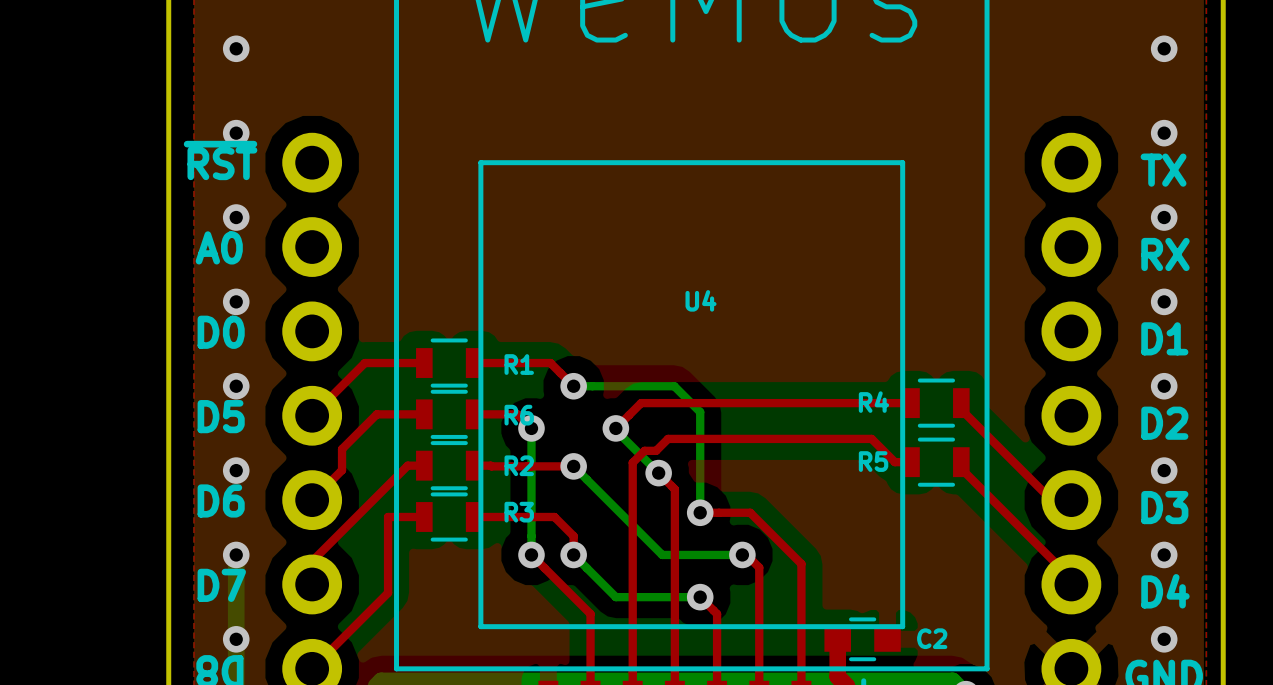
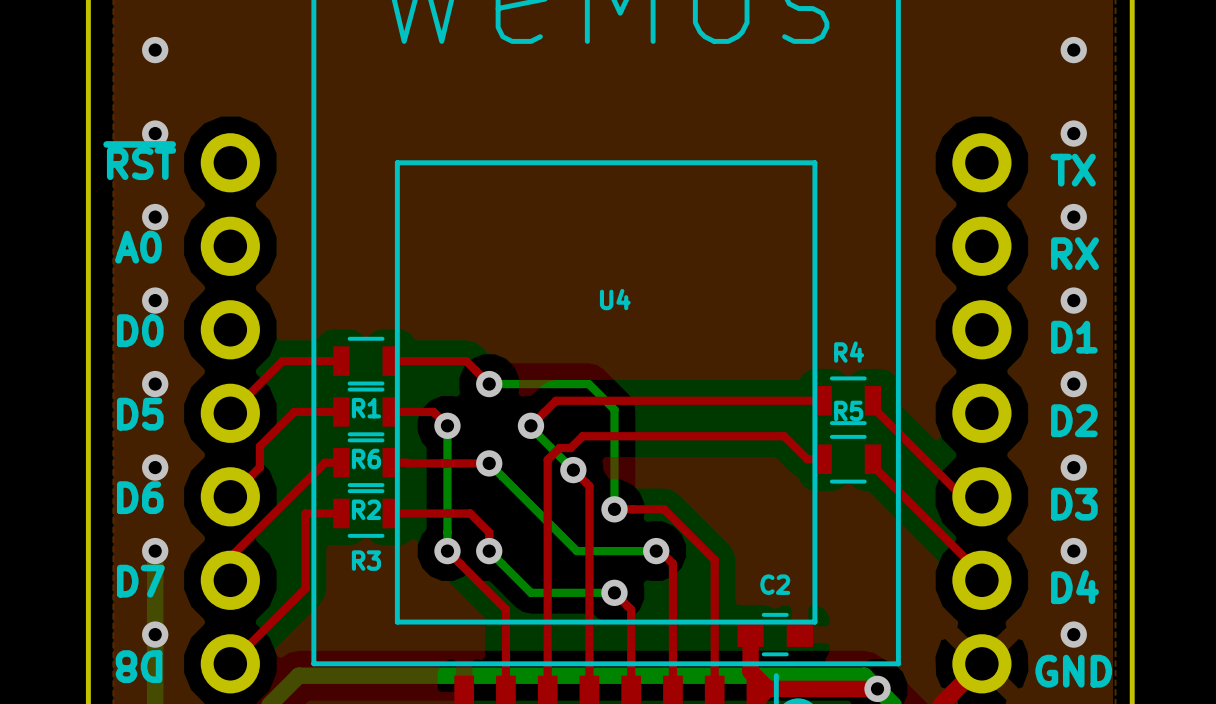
R1 name position: R1 (519, 364) -> R1 (366, 408)
R4 name position: R4 (873, 402) -> R4 (849, 352)
R6 name position: R6 (519, 415) -> R6 (366, 458)
R5 name position: R5 (873, 461) -> R5 (848, 410)
R2 name position: R2 (519, 465) -> R2 (366, 509)
R3 name position: R3 (519, 512) -> R3 (366, 560)
C2 name position: C2 (932, 638) -> C2 (775, 584)

